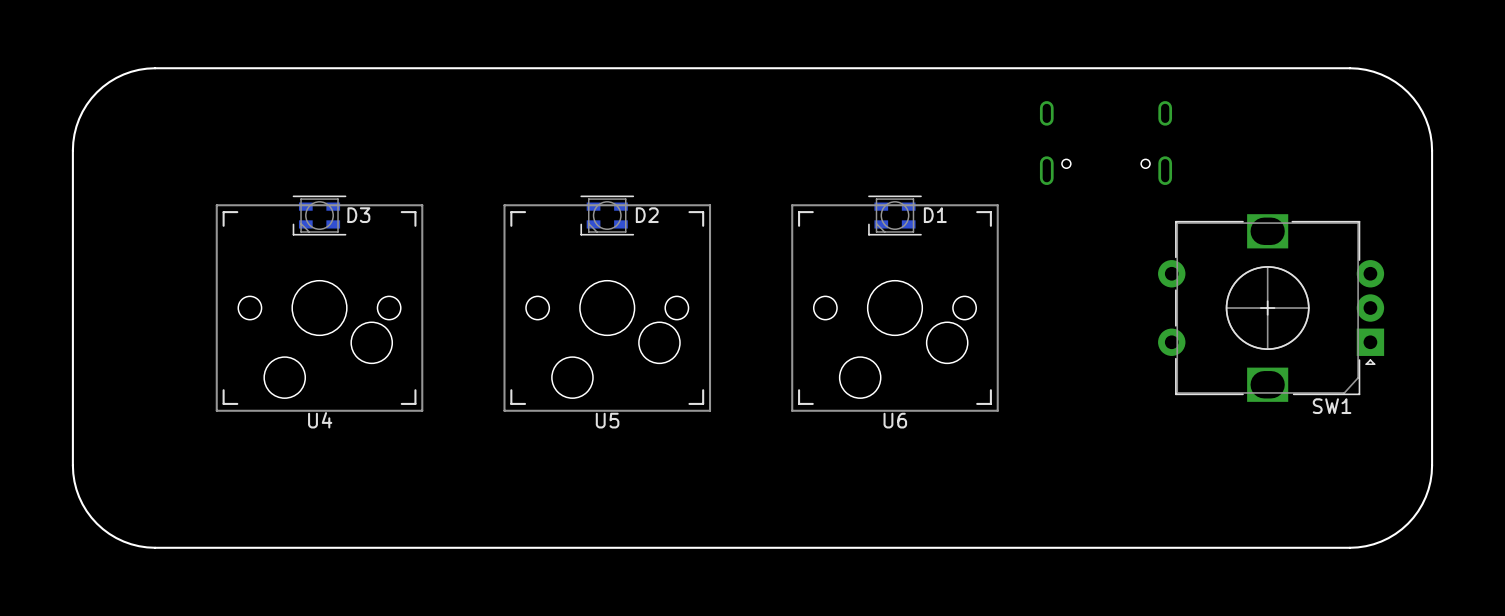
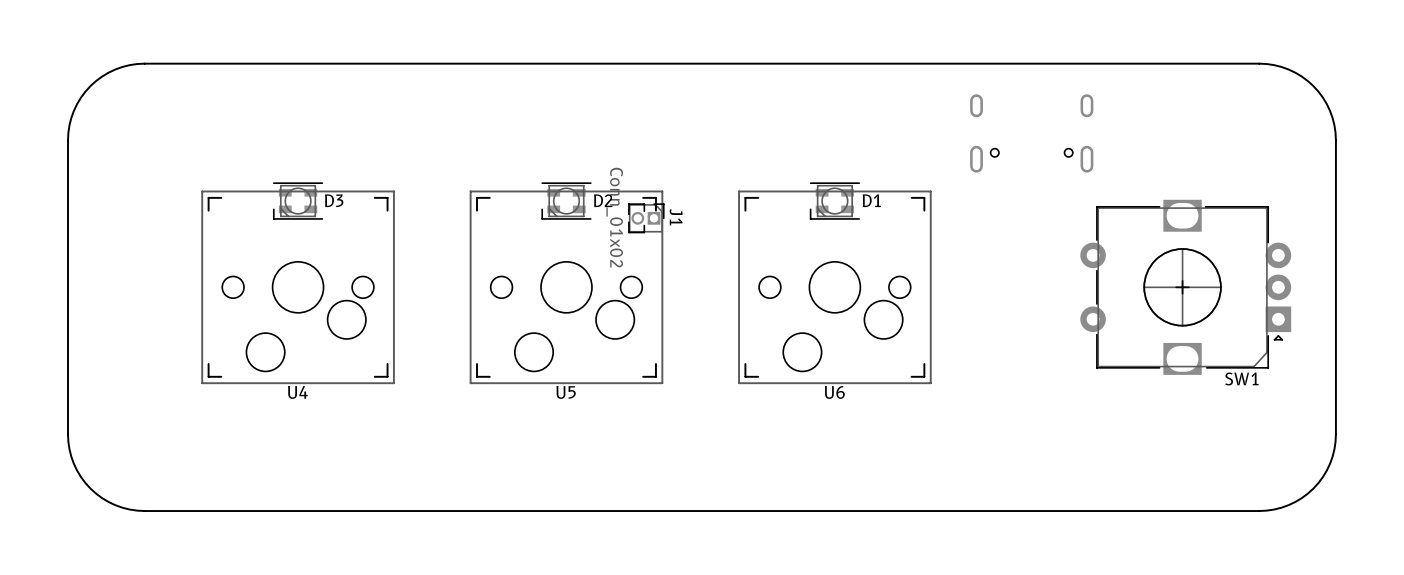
J1: none -> Conn_01x02 (646, 218)

